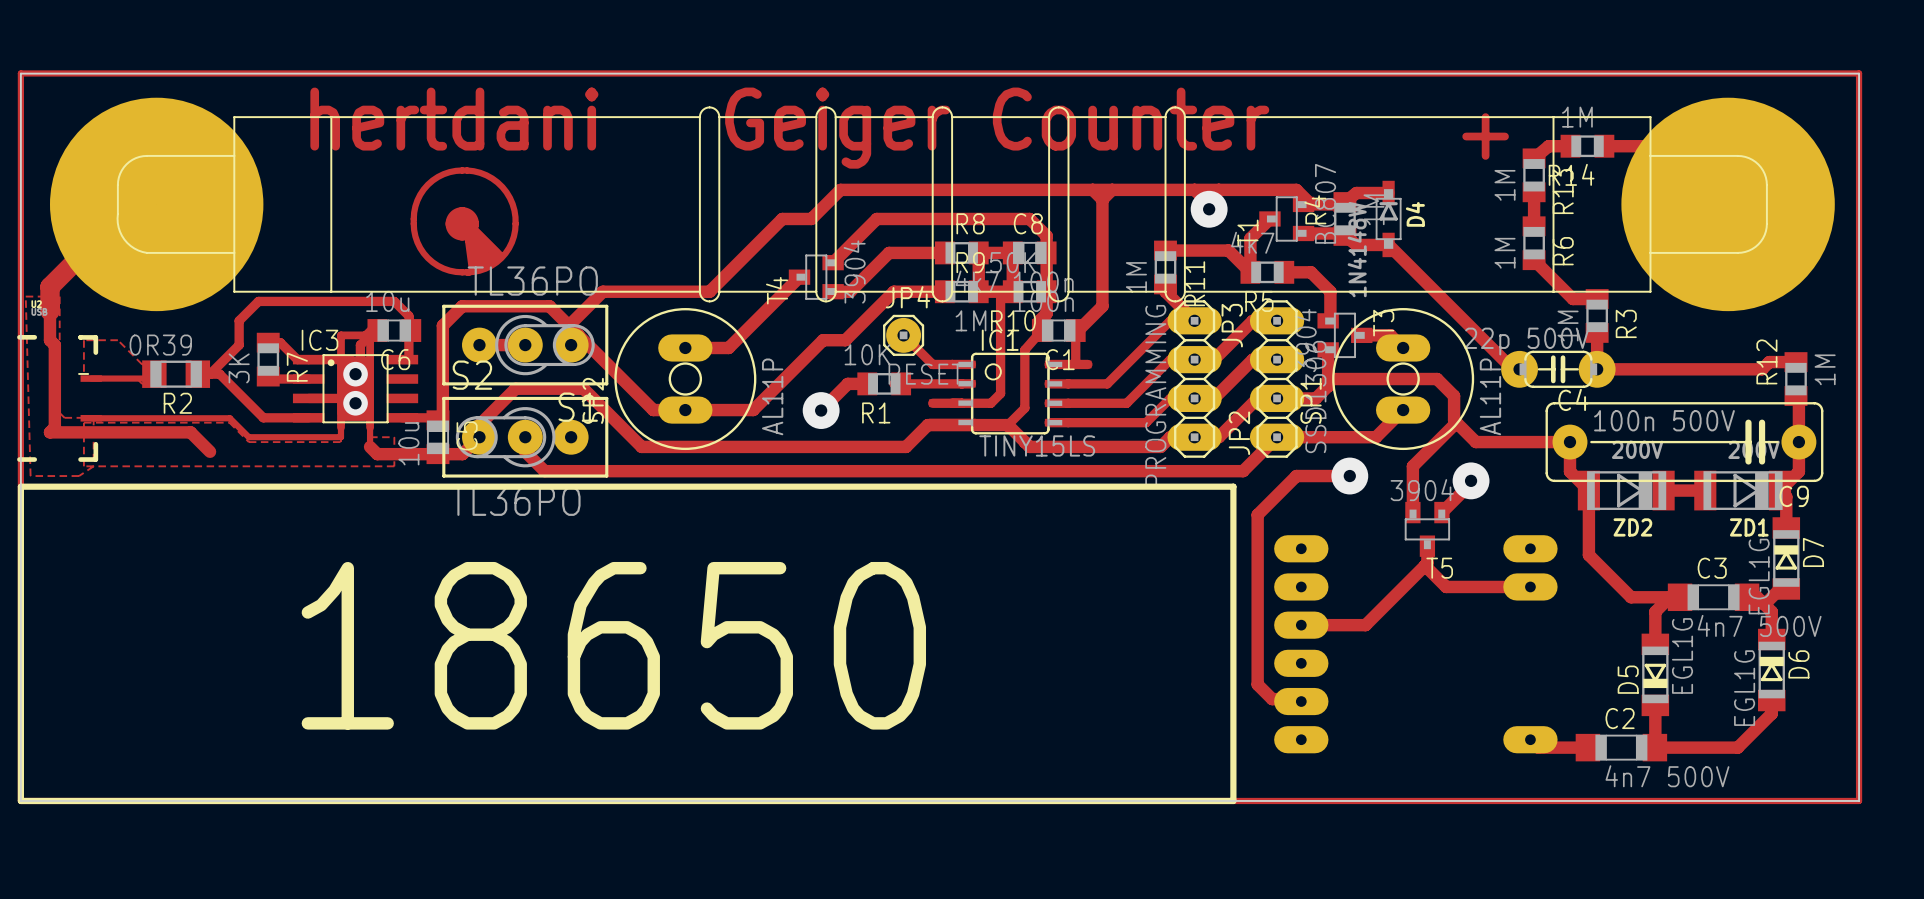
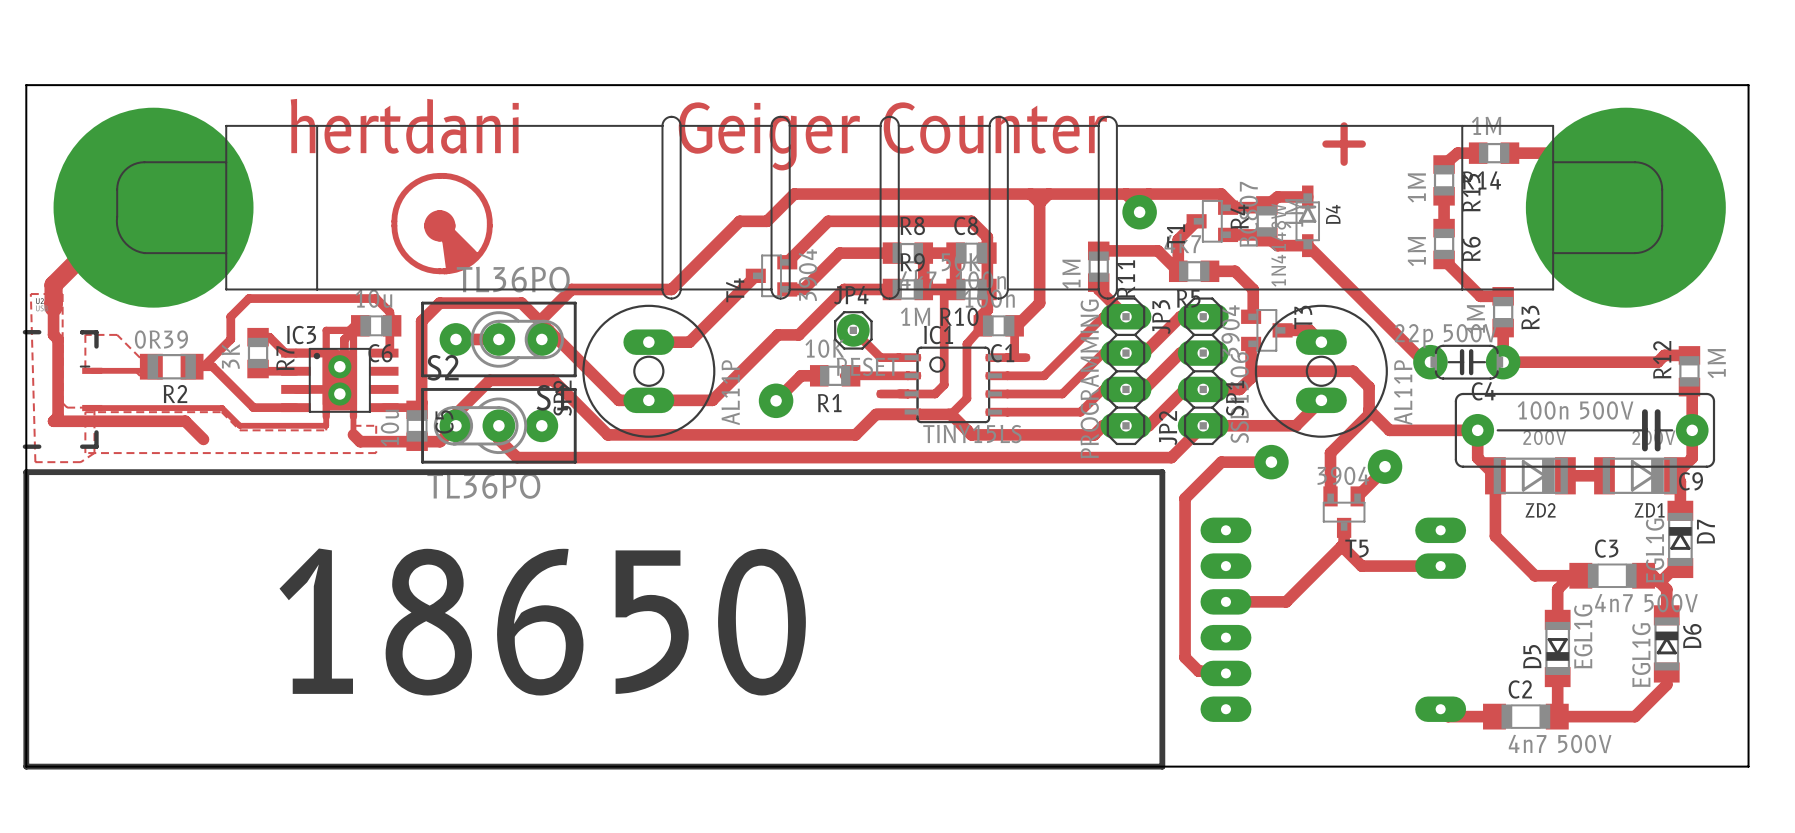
track: (20, 73) (20, 800) (1859, 800) (1859, 73) (20, 73) -> none
part footprint: [49, 97, 1835, 312] -> [53, 107, 1726, 308]

